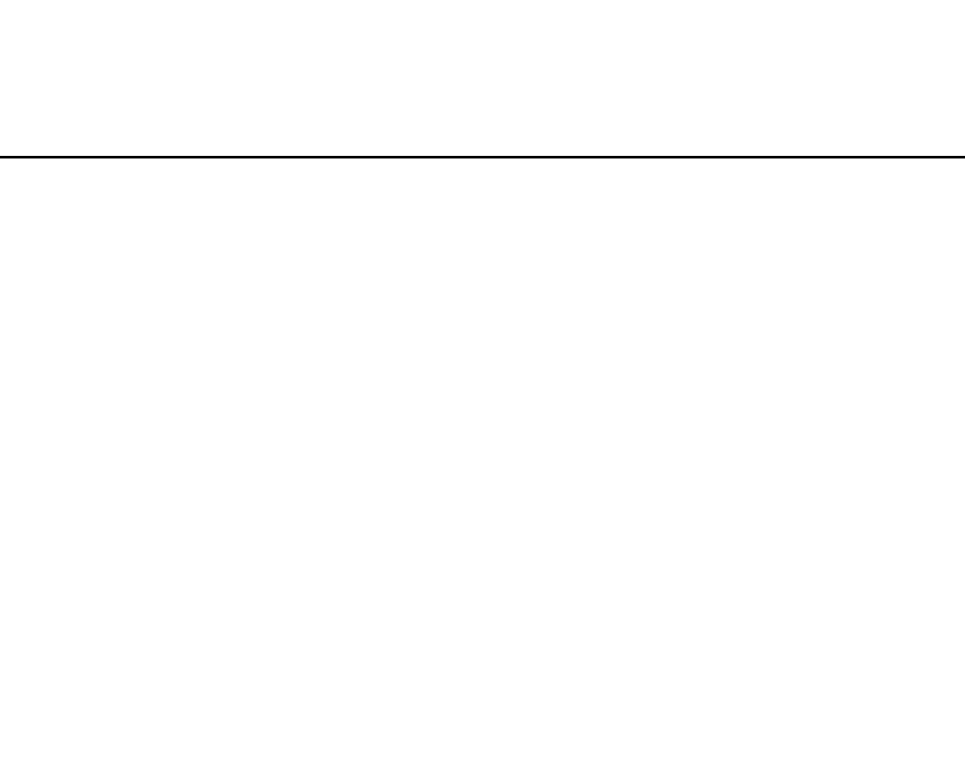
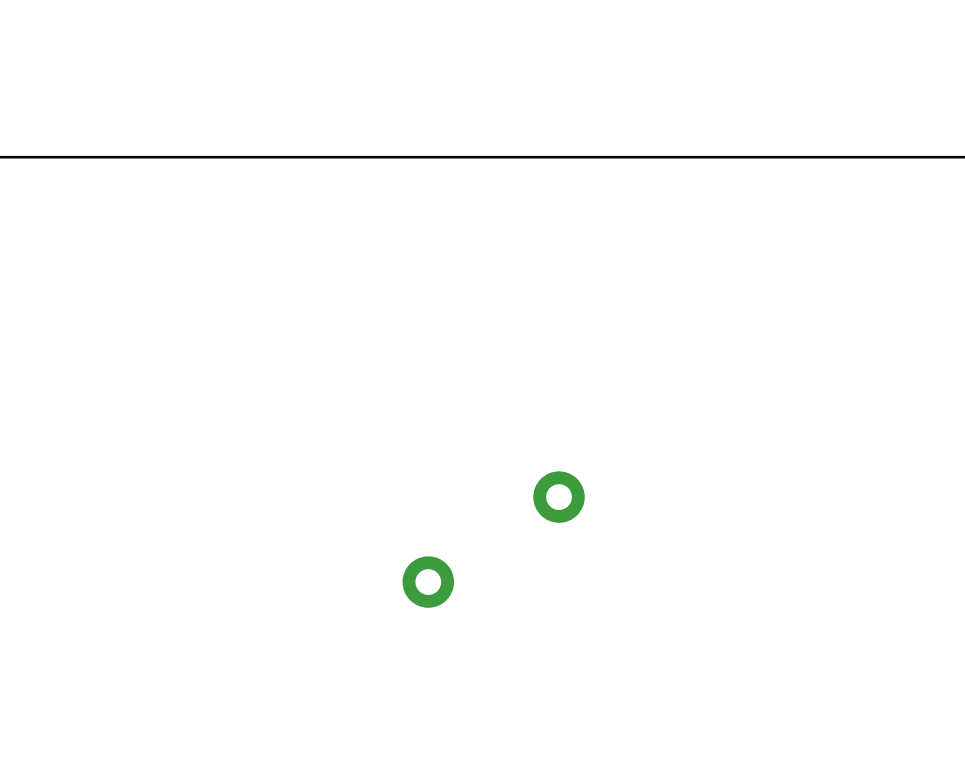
via: none -> (559, 497)
via: none -> (428, 582)

